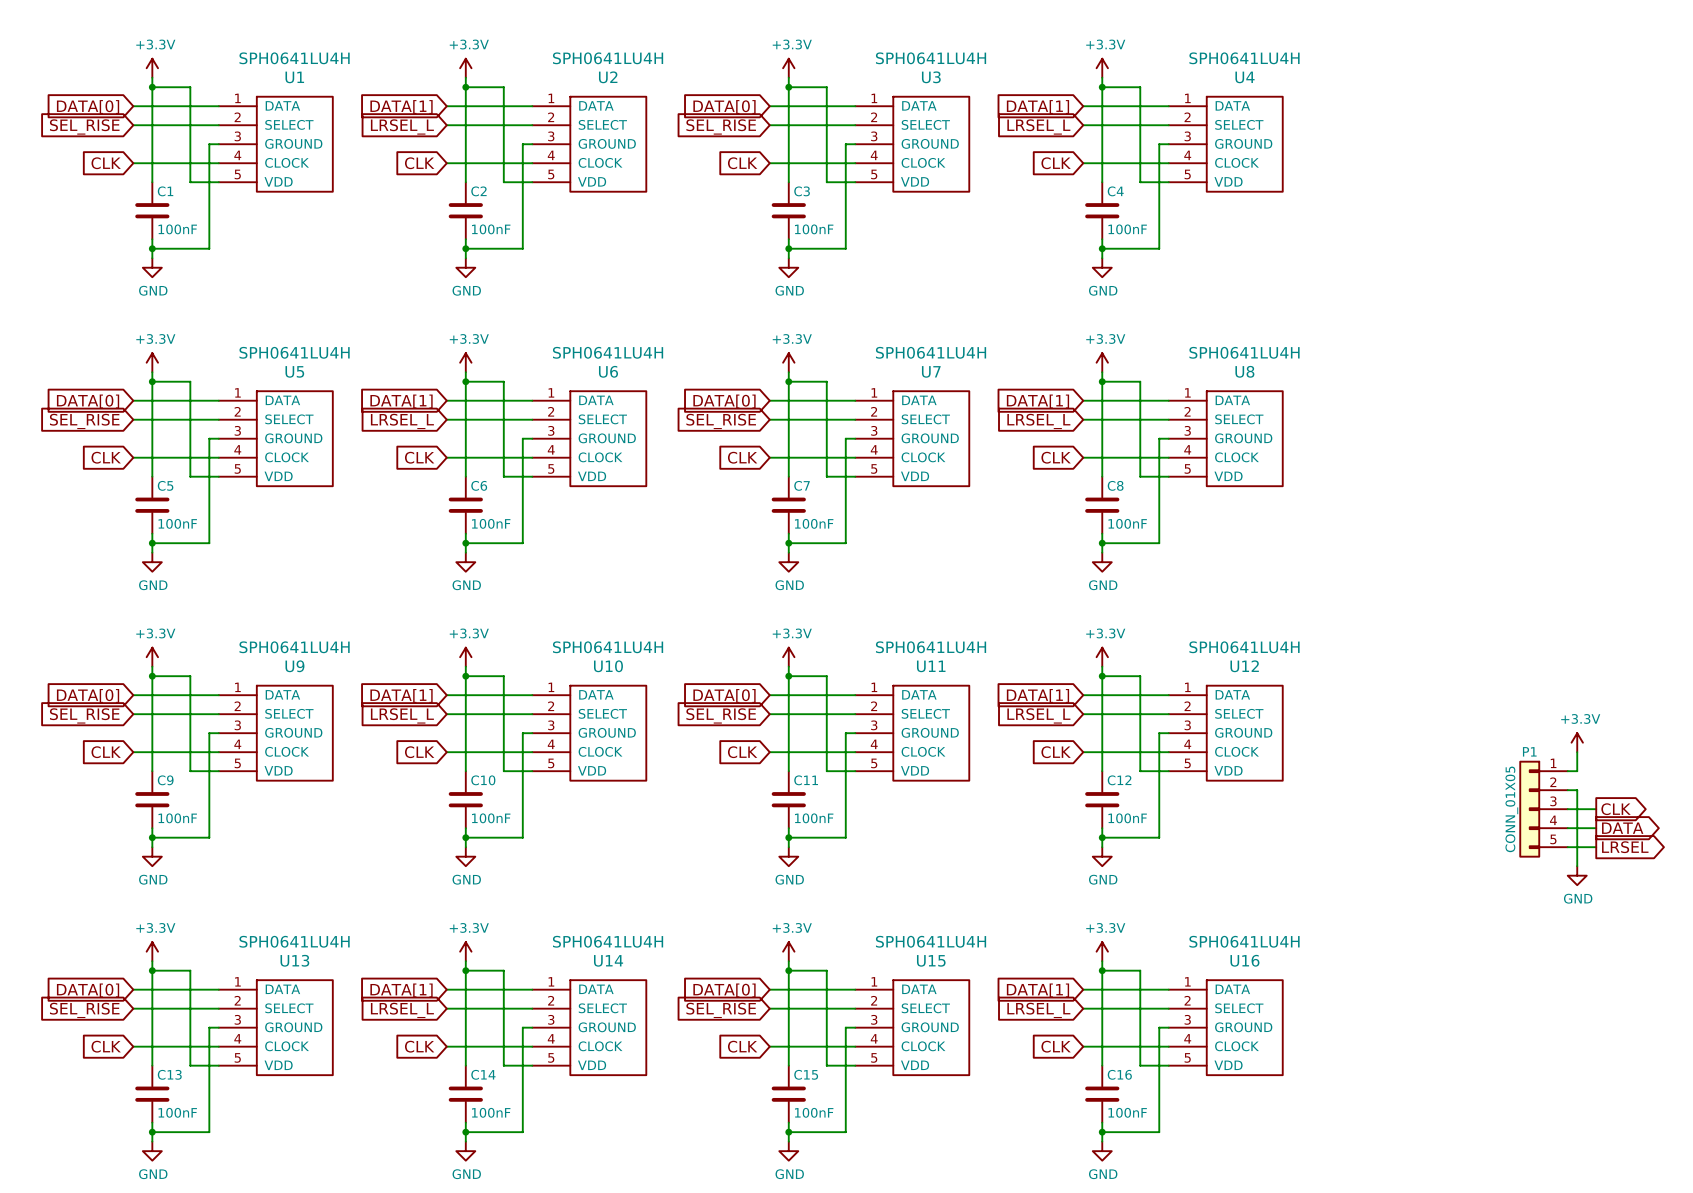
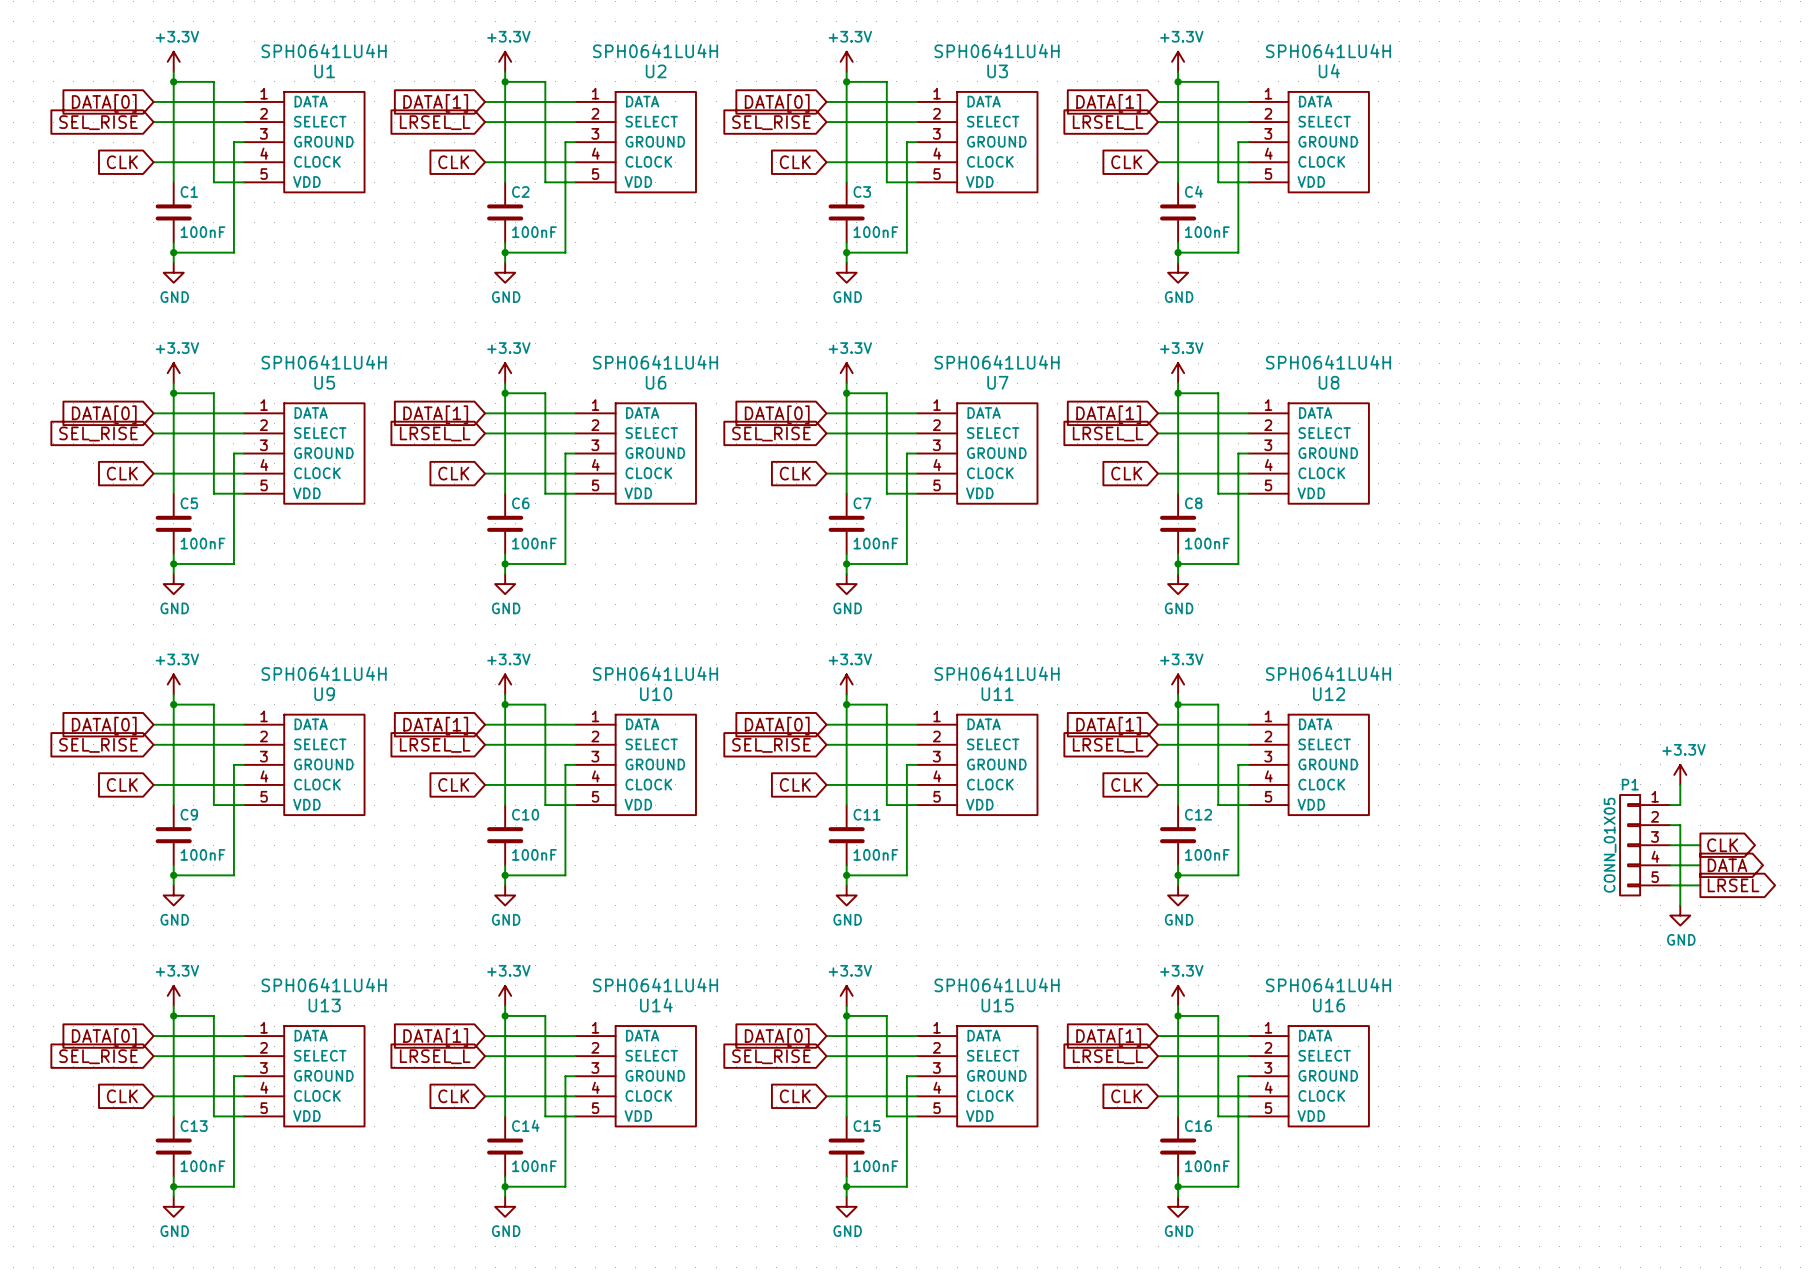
P1 symbol: [1519, 760, 1568, 858] -> [1620, 795, 1671, 896]

